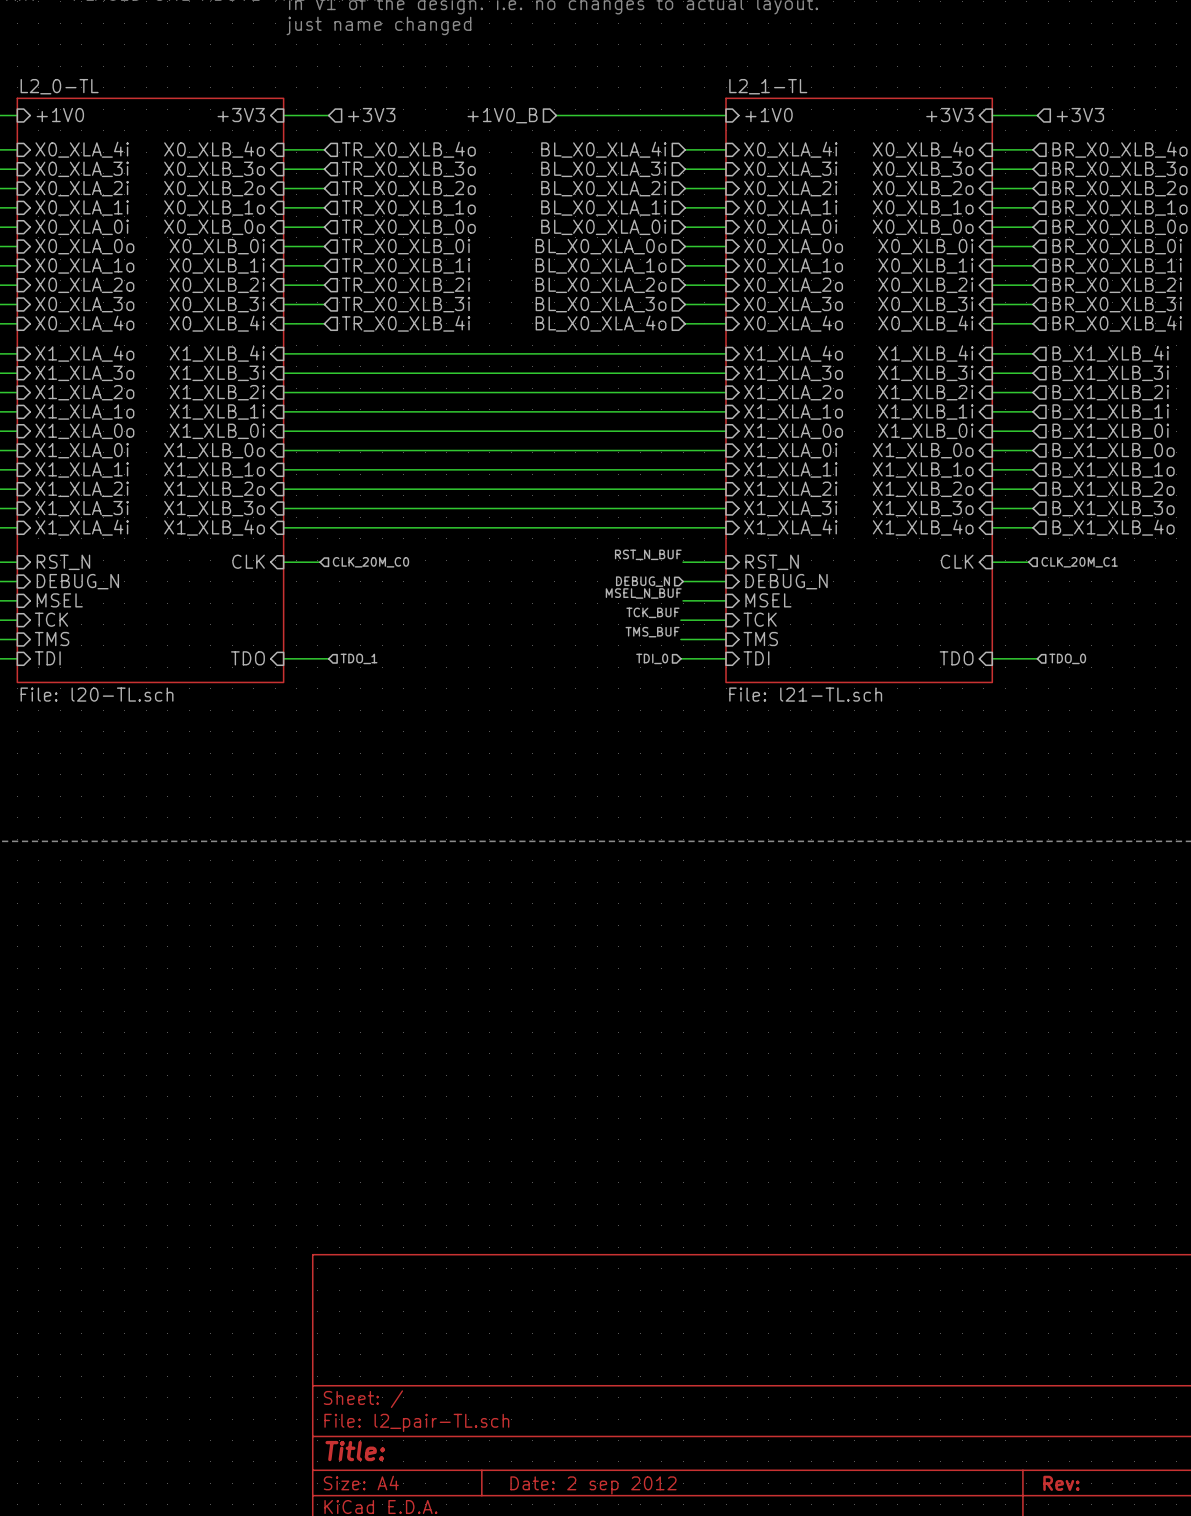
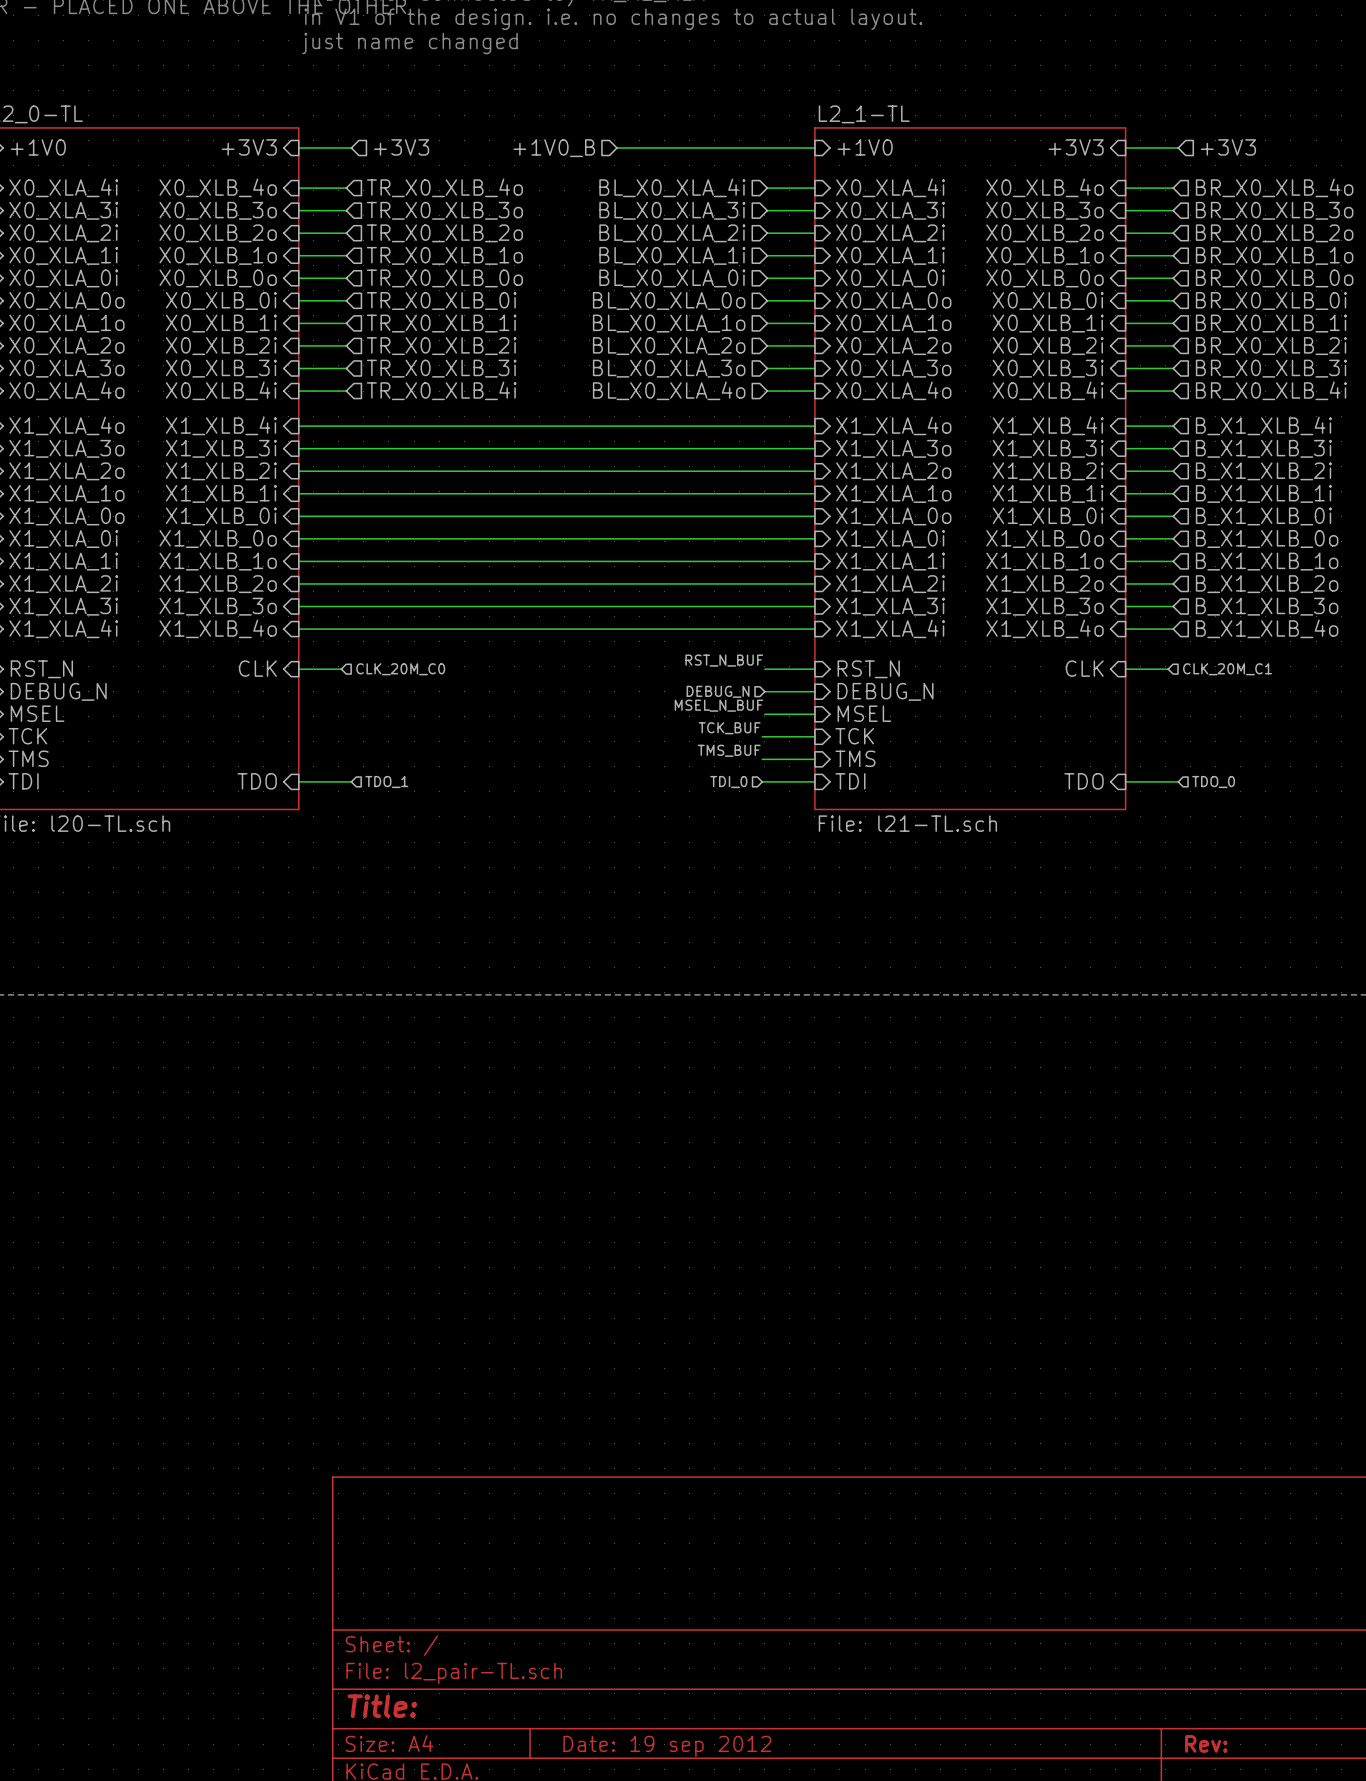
title block: Date: 2 sep 2012 (593, 1485) -> Date: 19 sep 2012 (667, 1746)

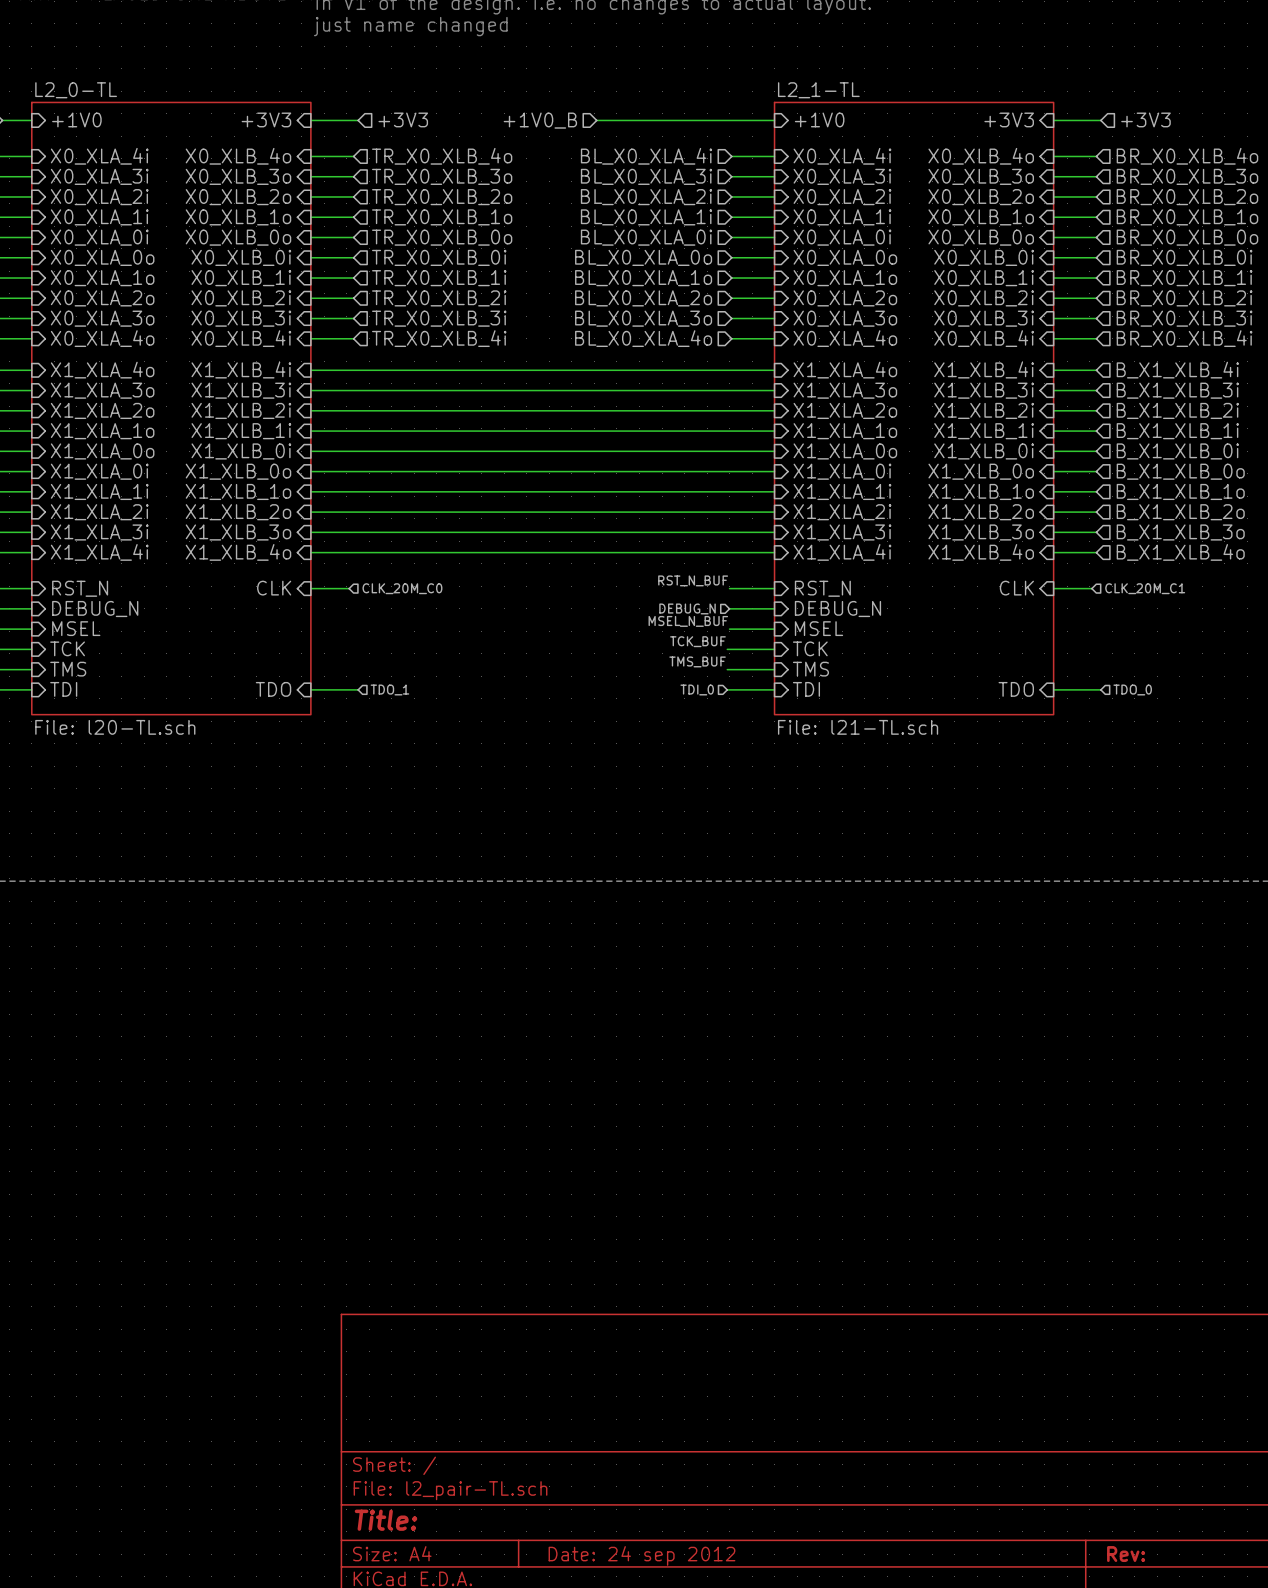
title block: Date: 19 sep 2012 (667, 1746) -> Date: 24 sep 2012 (641, 1555)

